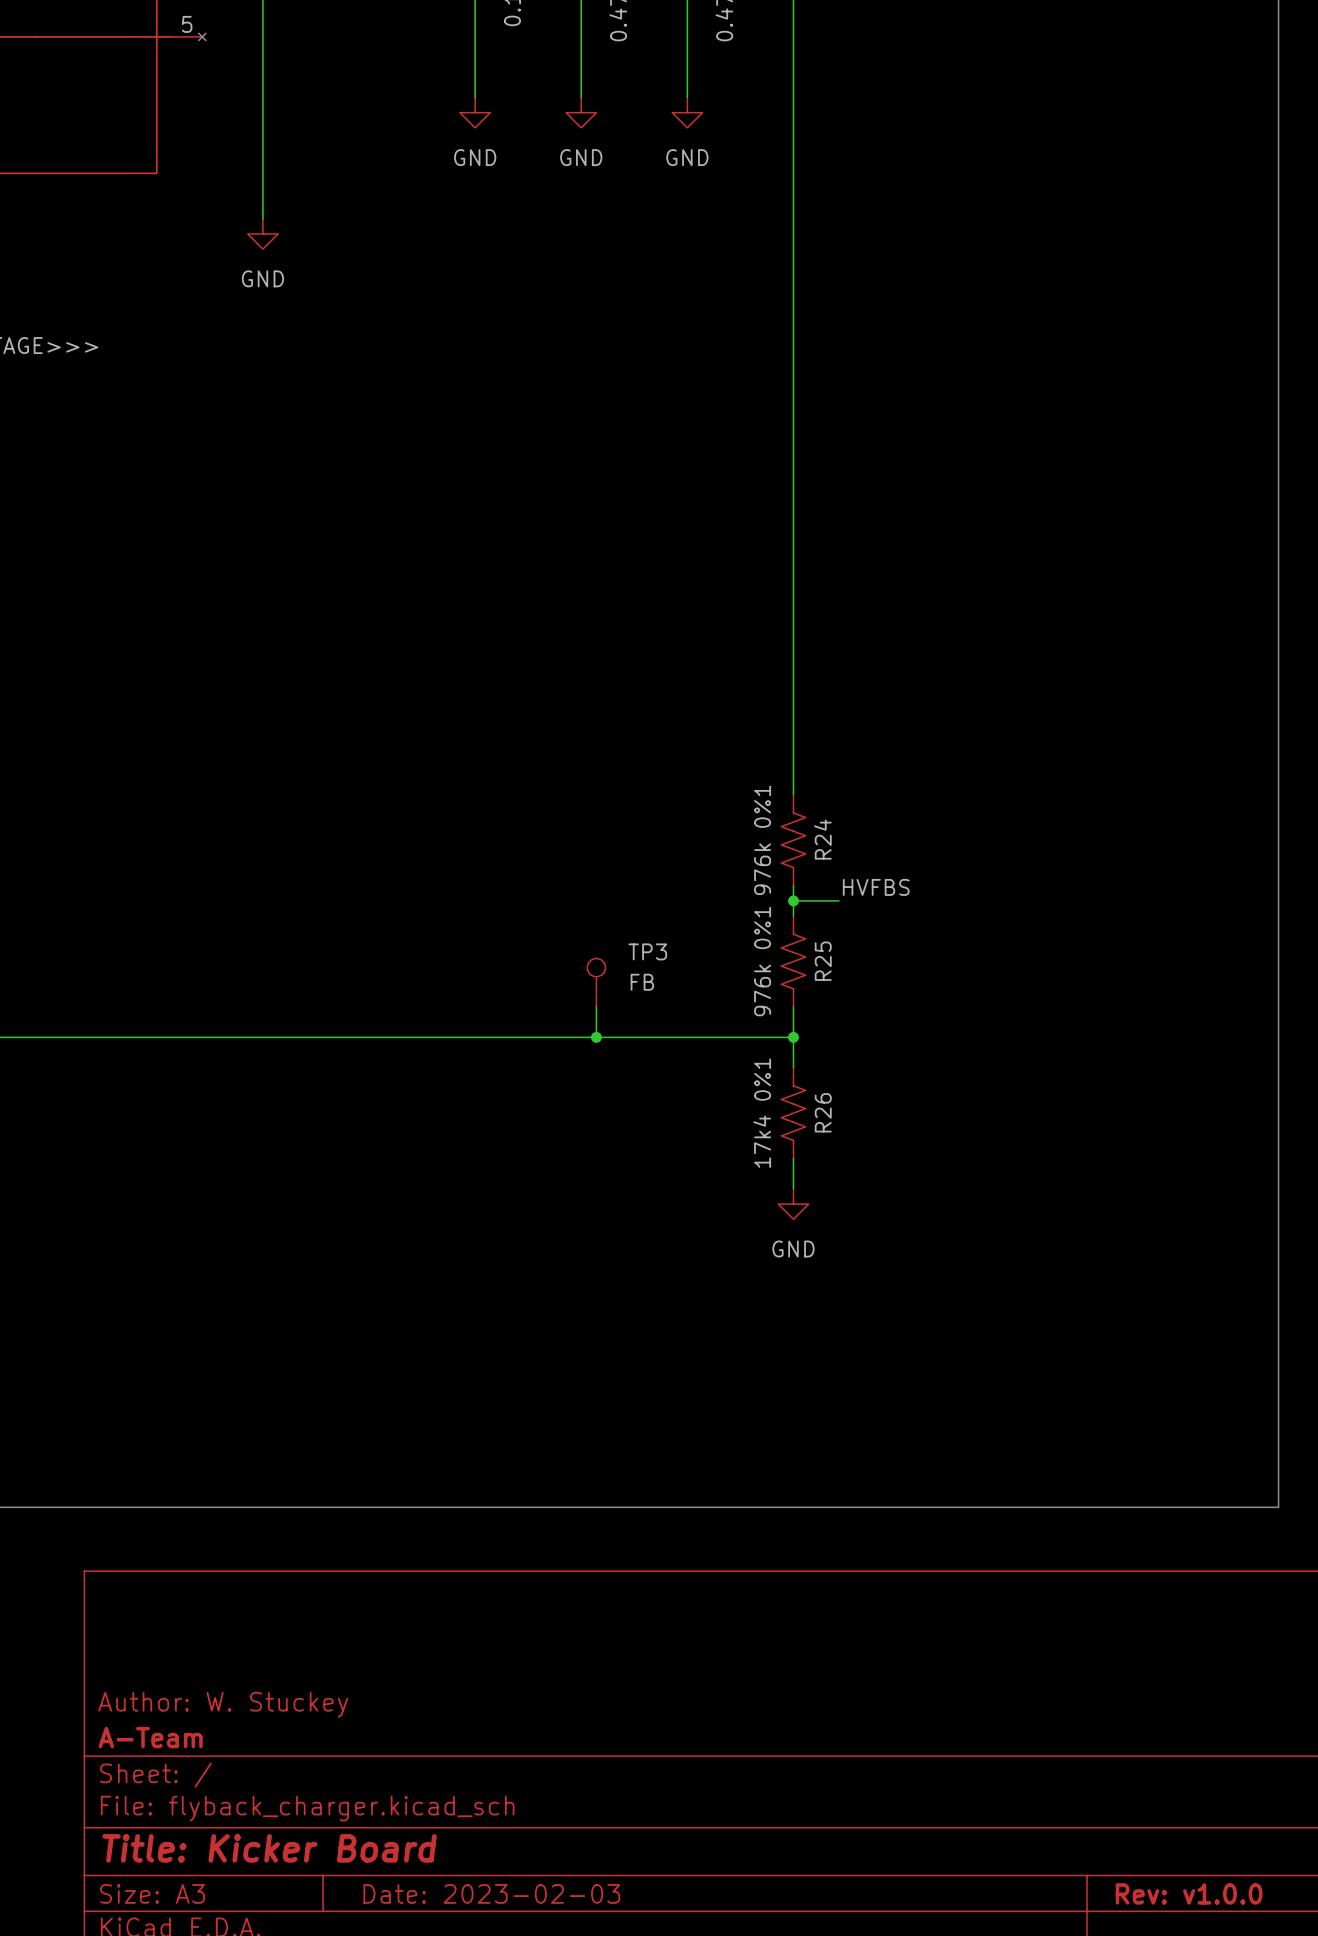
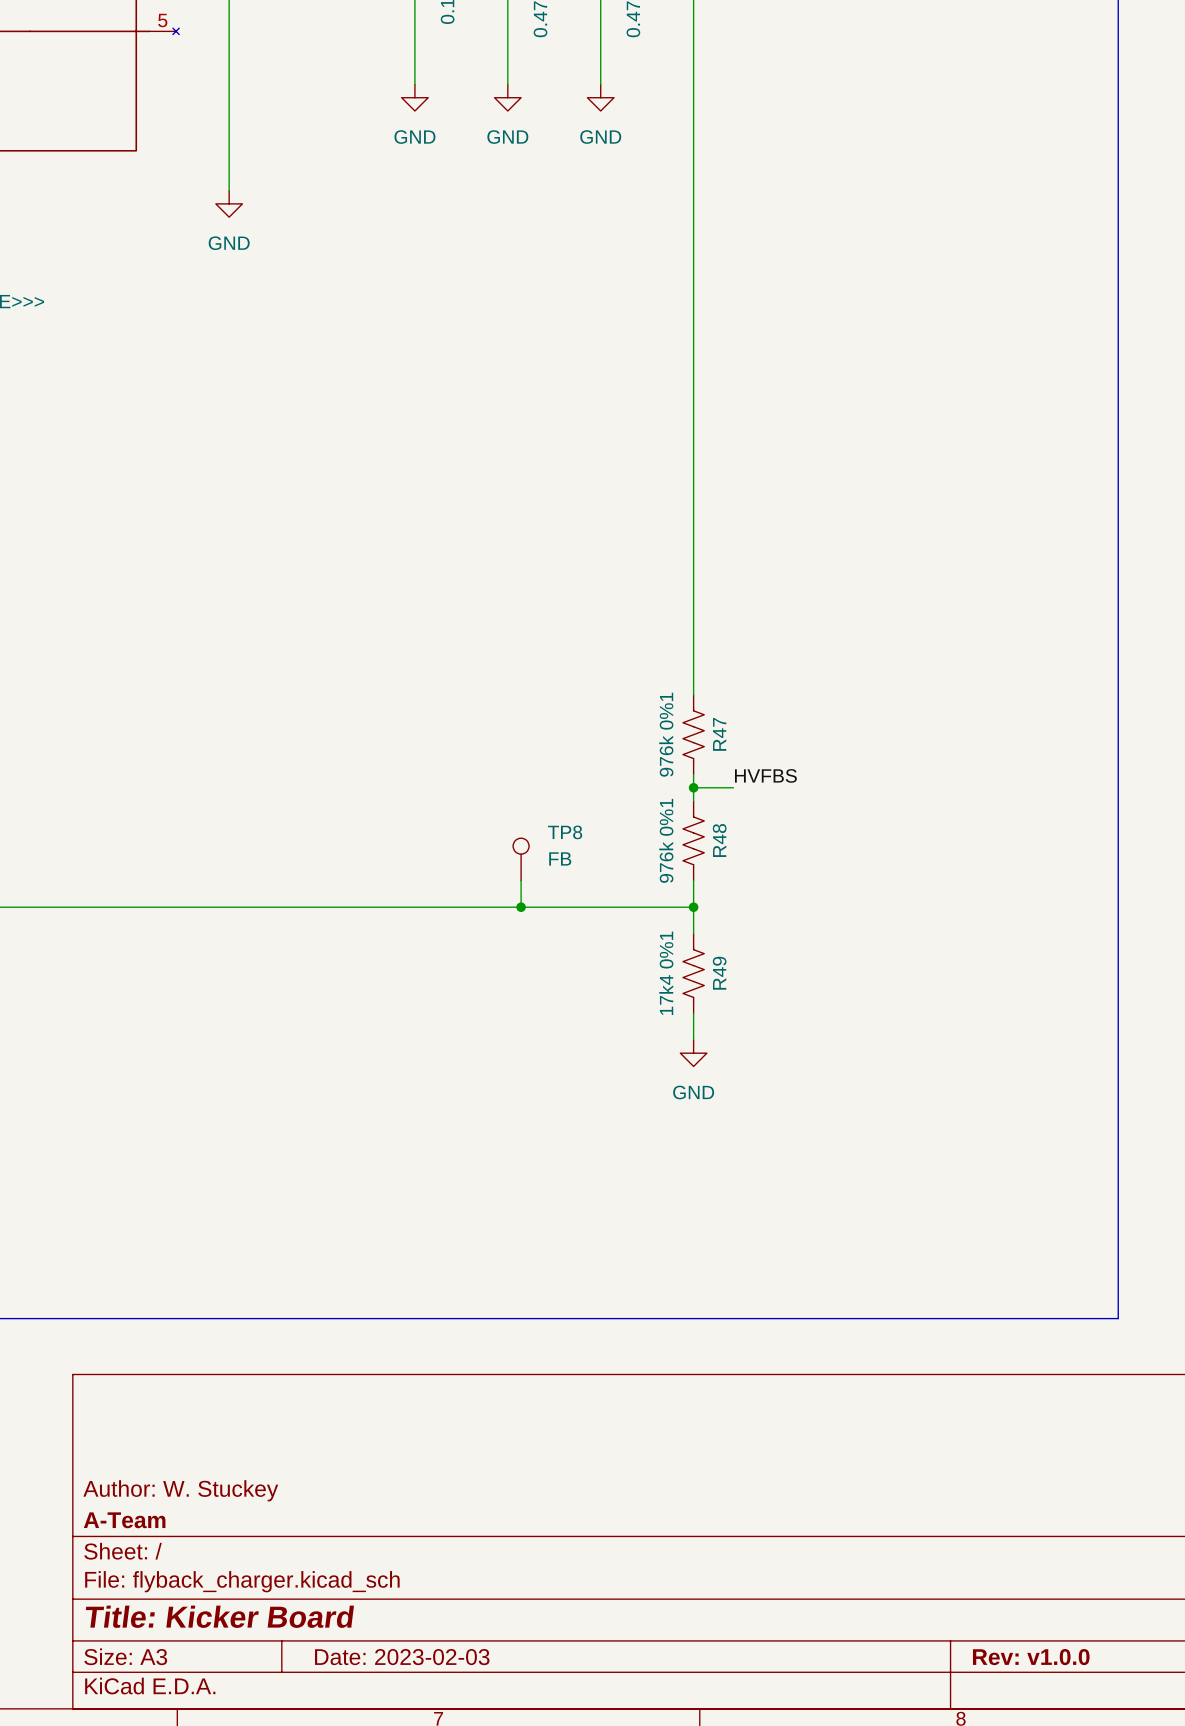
R24 name: R24 (822, 839) -> R47 (719, 734)
TP3 name: TP3 (647, 951) -> TP8 (565, 832)
R25 name: R25 (823, 961) -> R48 (719, 840)
R26 name: R26 (823, 1112) -> R49 (719, 973)

